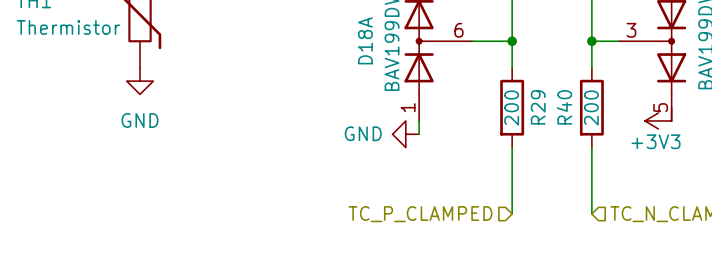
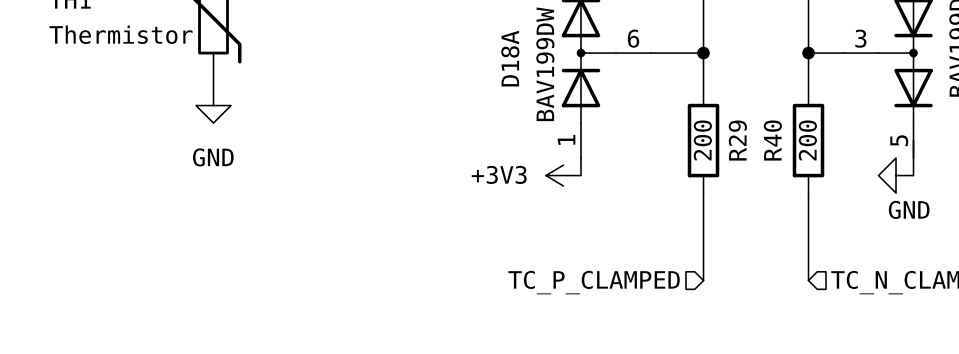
power symbol: +3V3 (658, 120) -> none
wire: none -> (913, 158) (913, 175)
power symbol: GND (405, 134) -> +3V3 (563, 175)
power symbol: none -> GND (896, 175)

